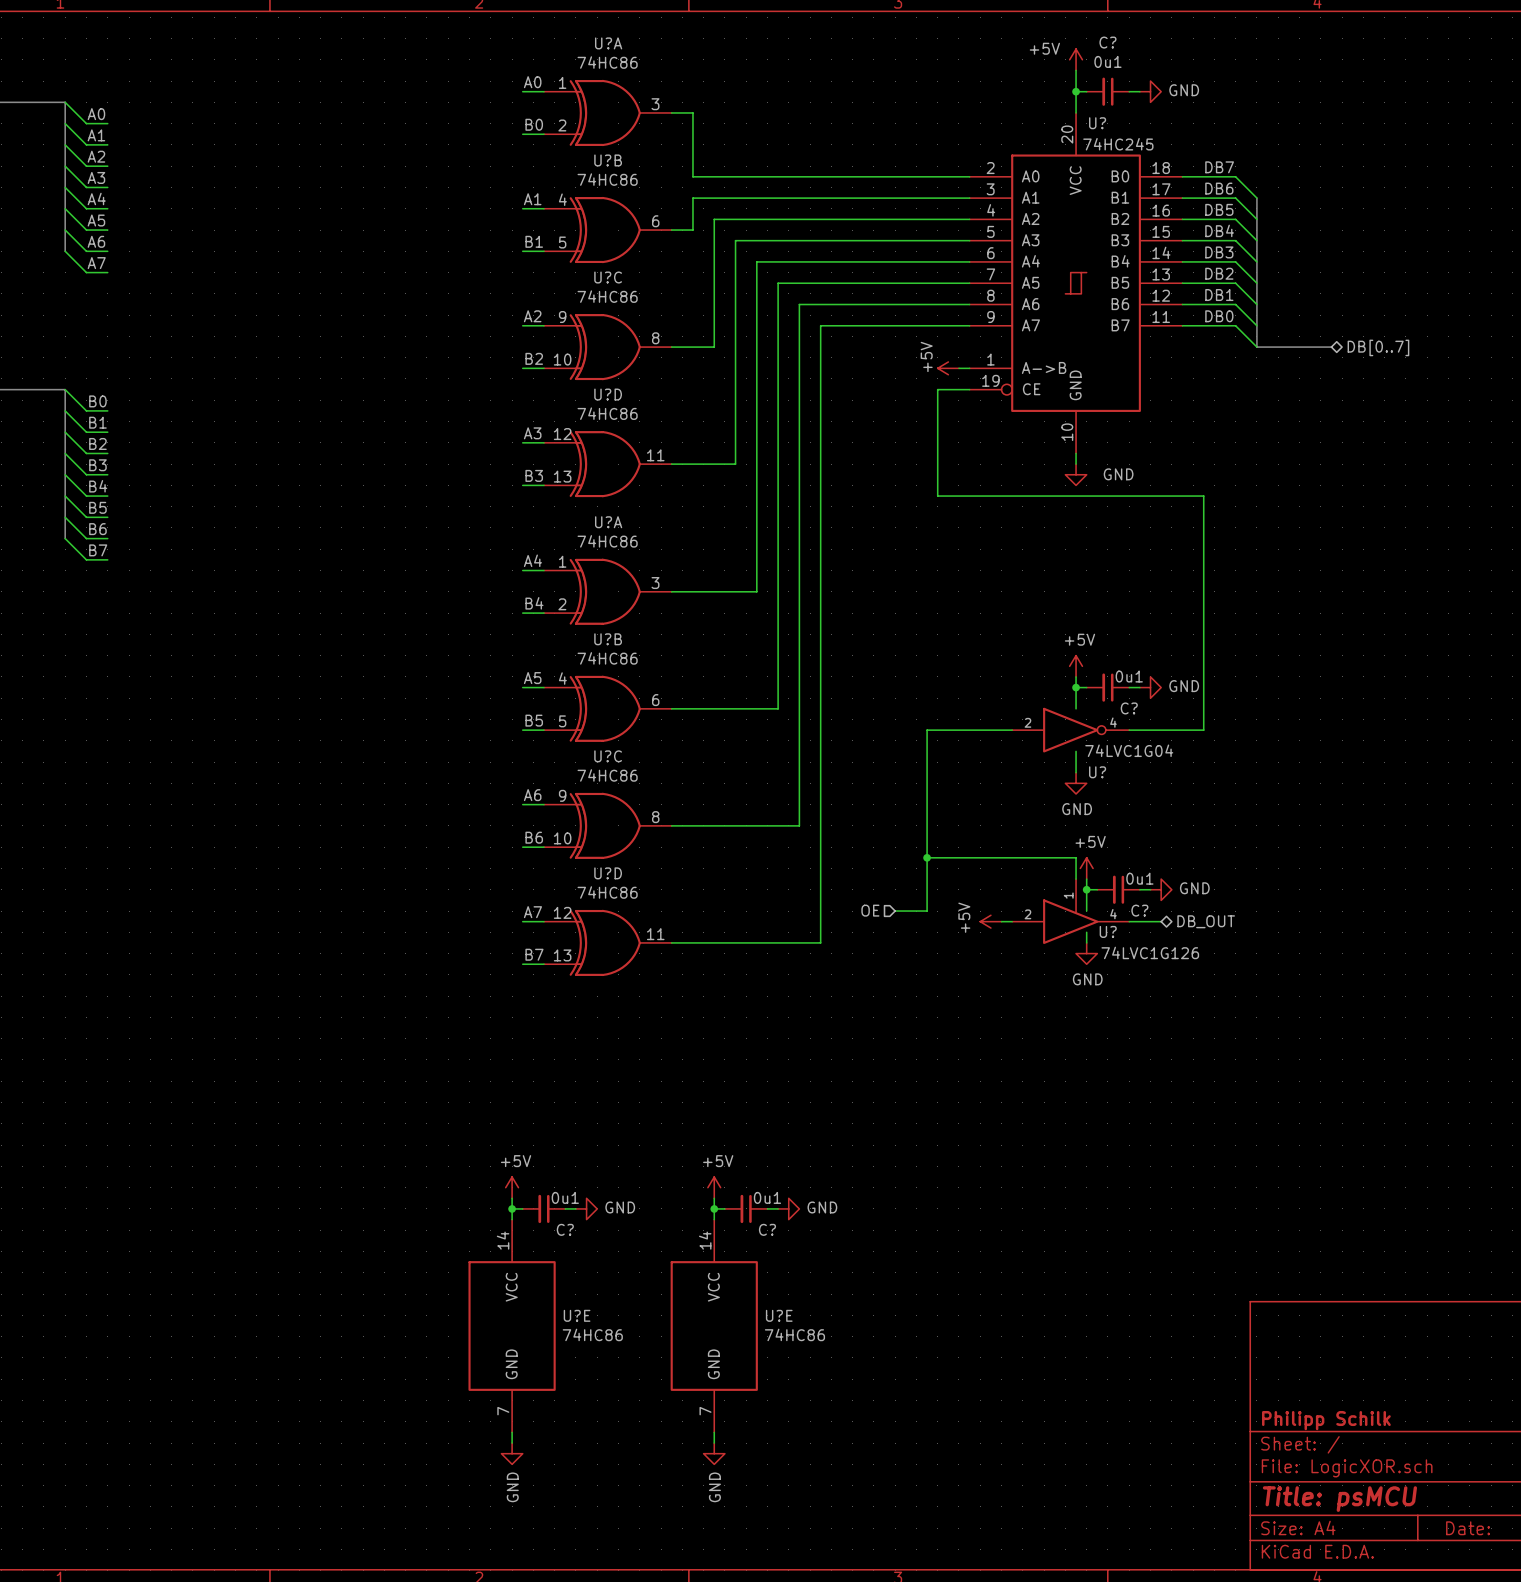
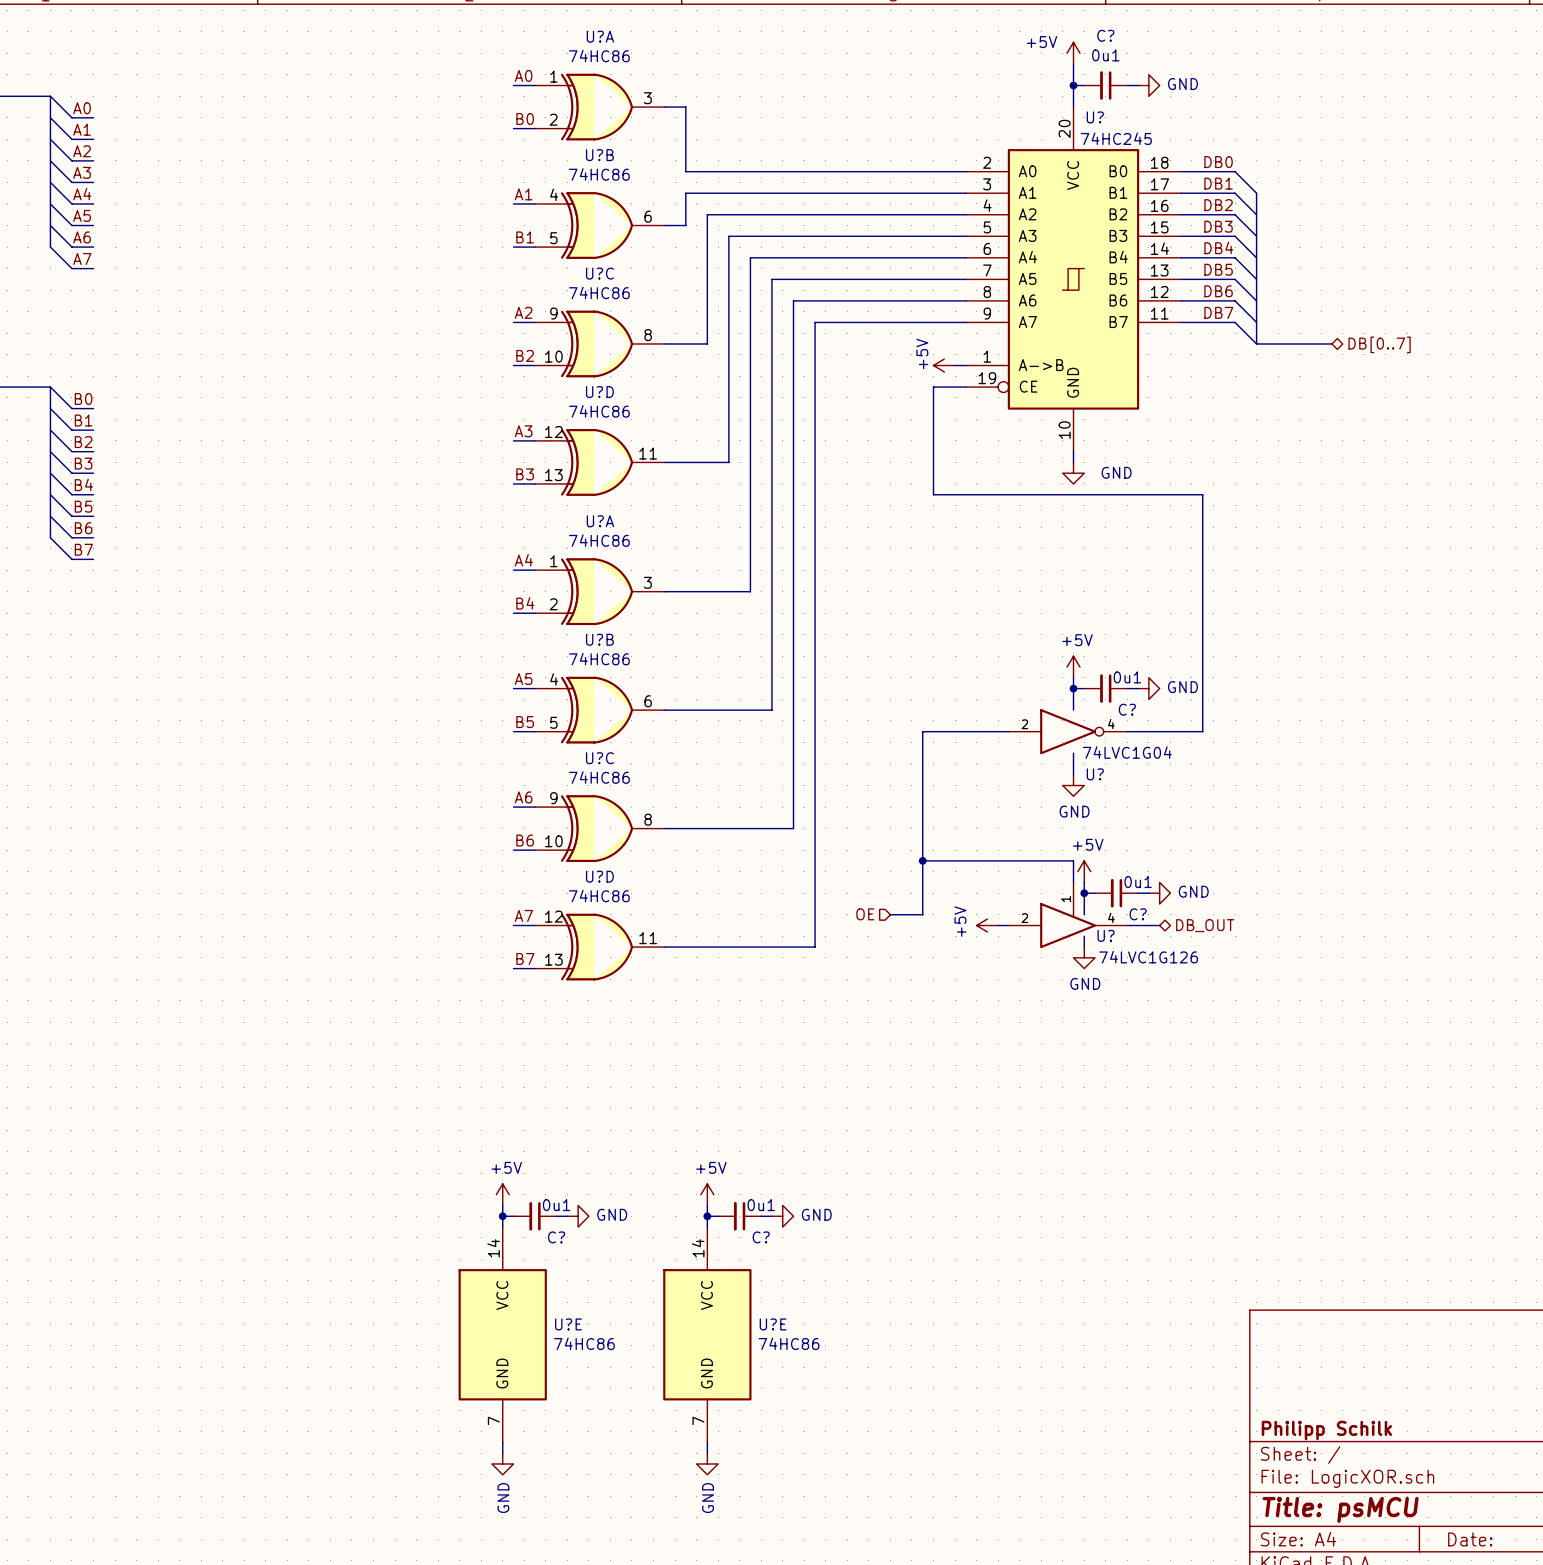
label: DB7 (1219, 167) -> DB0 (1218, 162)
label: DB6 (1219, 188) -> DB1 (1218, 183)
label: DB5 (1219, 209) -> DB2 (1218, 205)
label: DB4 (1219, 230) -> DB3 (1218, 226)
label: DB3 (1219, 252) -> DB4 (1218, 247)
label: DB2 (1219, 273) -> DB5 (1218, 269)
label: DB1 (1219, 295) -> DB6 (1218, 291)
label: DB0 (1219, 316) -> DB7 (1218, 312)

